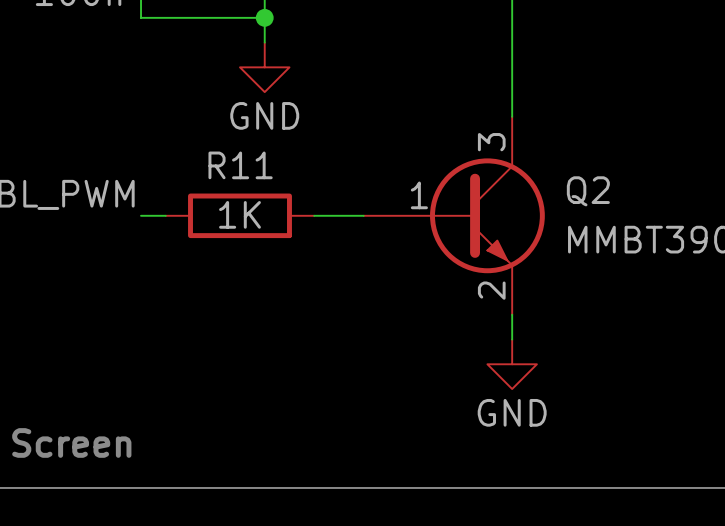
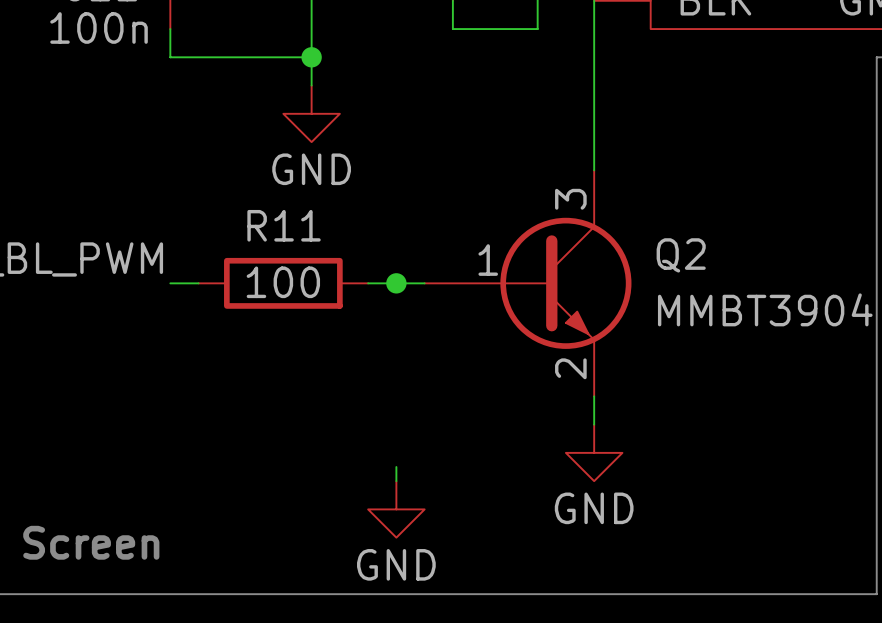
R11 value: 1K (239, 214) -> 100 (283, 282)
junction: none -> (396, 283)
wire: none -> (396, 467) (396, 481)
power symbol: none -> GND (396, 509)

